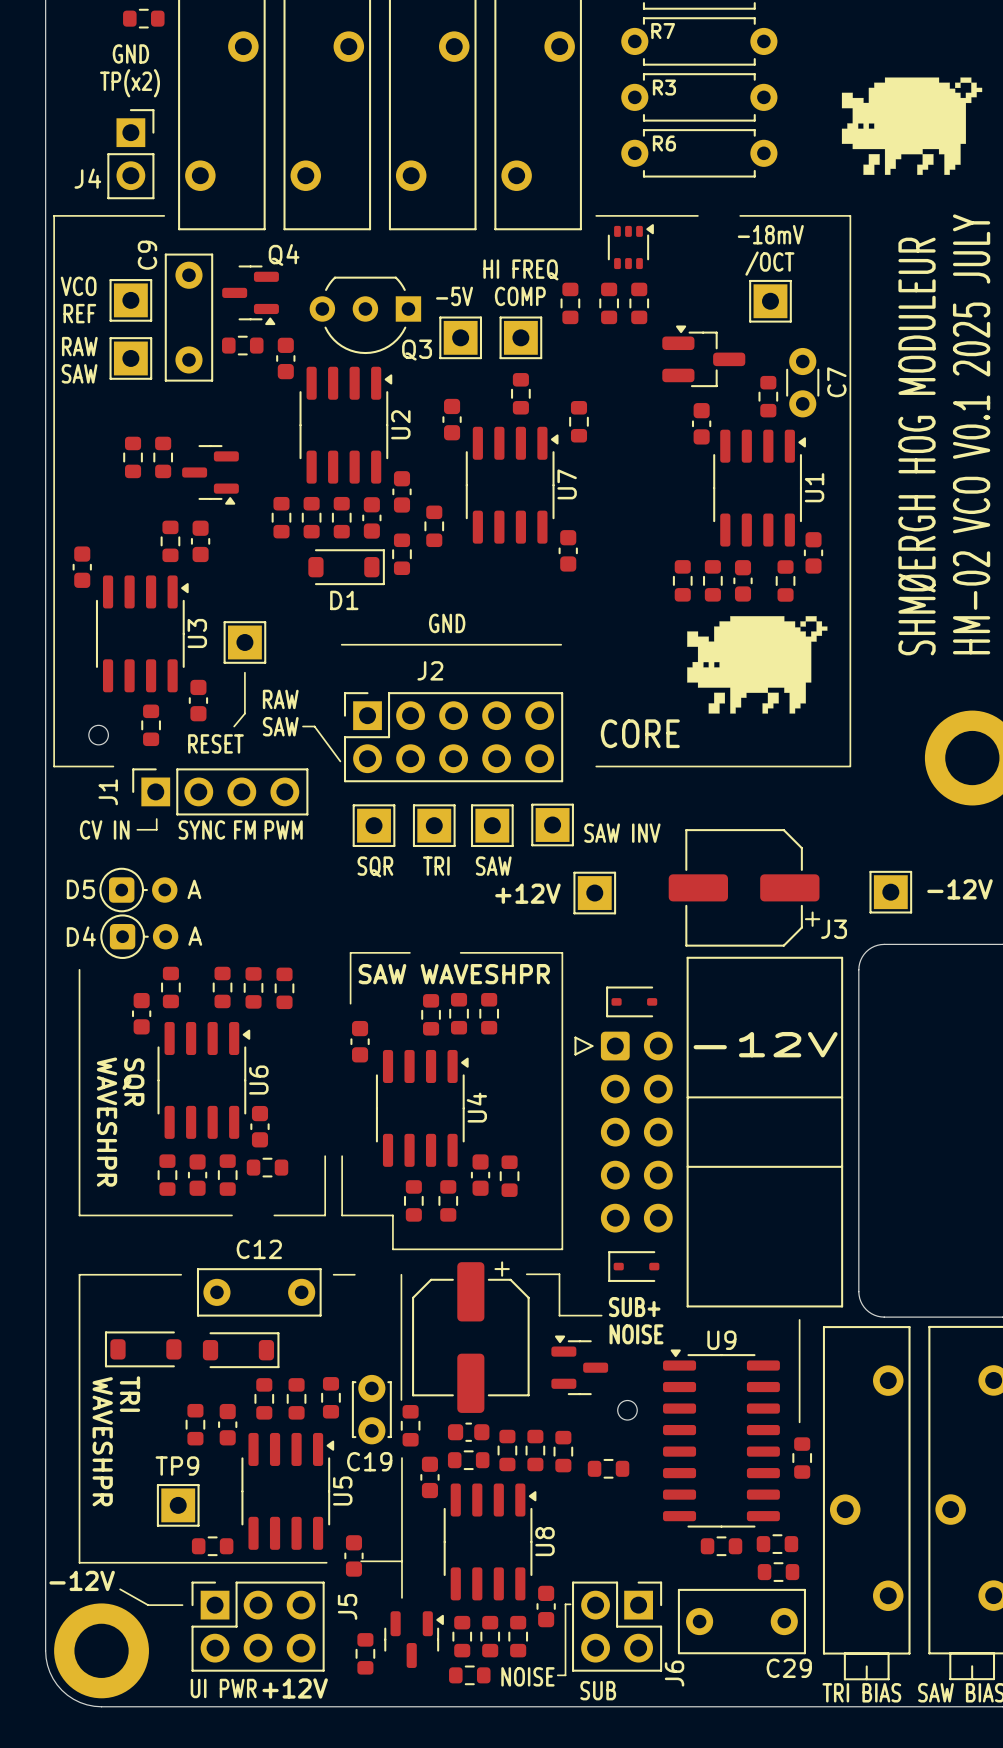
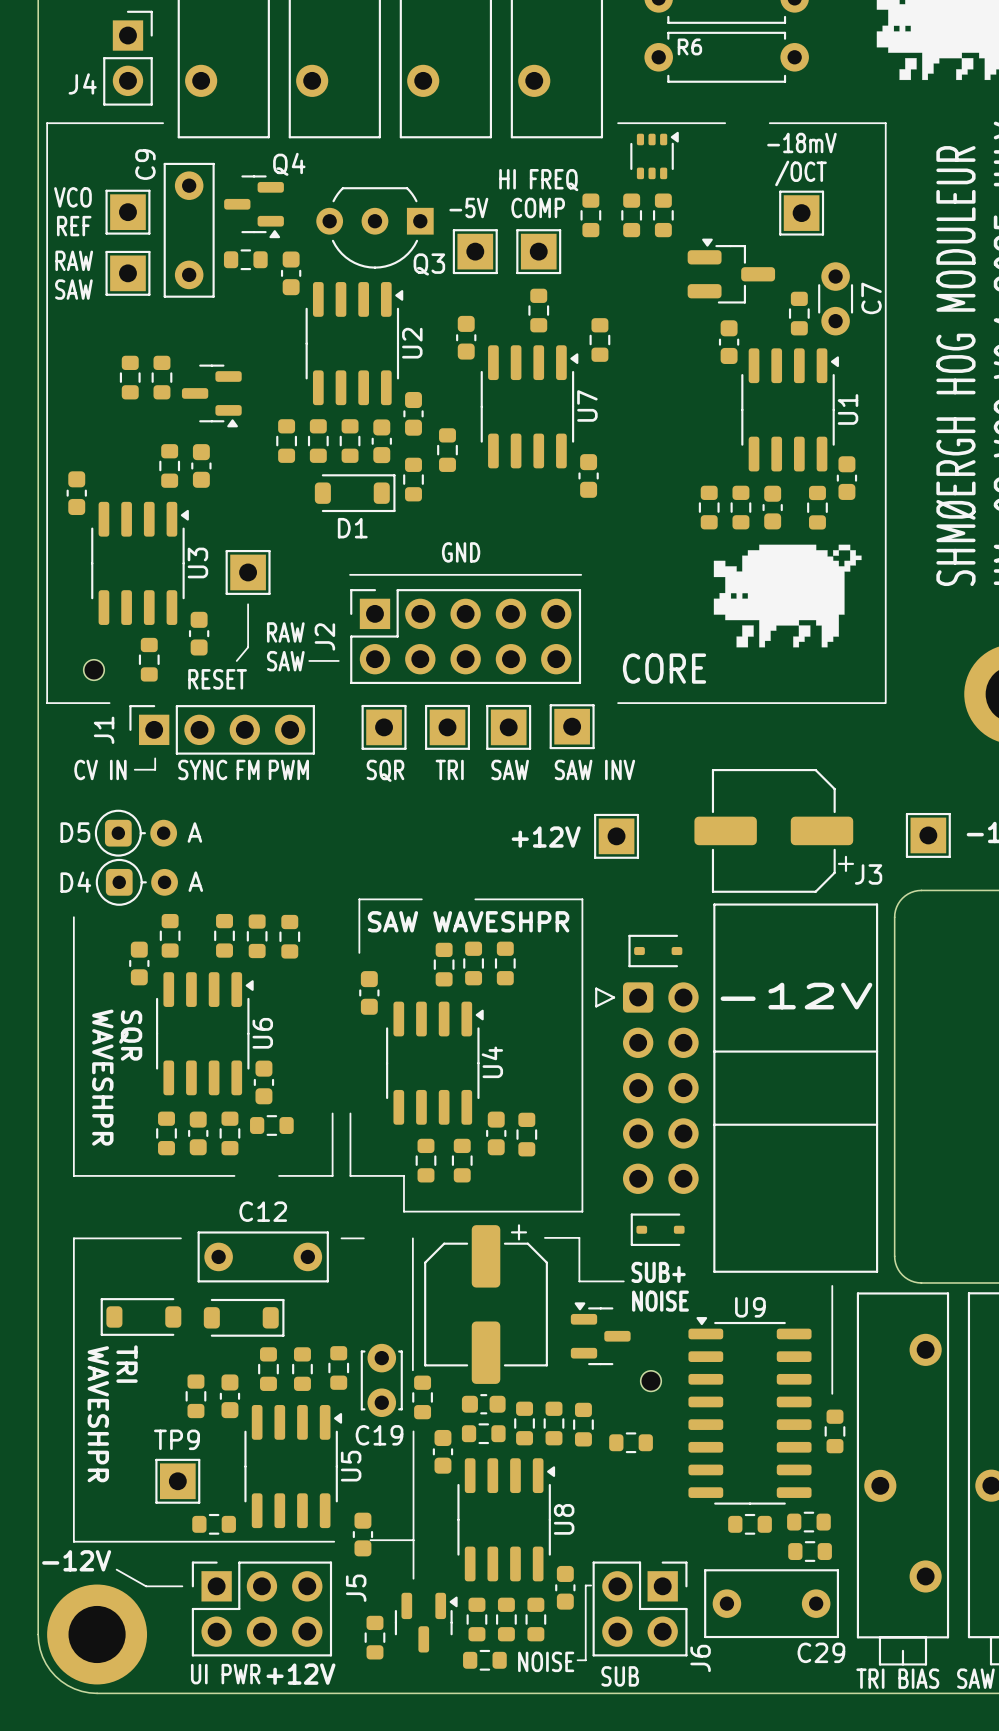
J2 name rotation: 0° (430, 670) -> 90° counterclockwise (324, 636)
J2 name position: J2 (430, 670) -> J2 (324, 636)
line: (314, 726) (340, 761) -> (321, 660) (338, 660)
J2 position: (453, 737) -> (465, 636)
part: none -> (572, 726)
part: none -> (384, 727)
part: none -> (447, 727)
part: none -> (508, 727)
part: (552, 824) -> none
part: (374, 825) -> none
part: (434, 825) -> none
part: (492, 825) -> none
text position: SAW INV (622, 833) -> SAW INV (594, 769)
text position: SQR (375, 866) -> SQR (385, 770)
text position: TRI (436, 866) -> TRI (449, 769)
text position: SAW (493, 866) -> SAW (510, 769)

